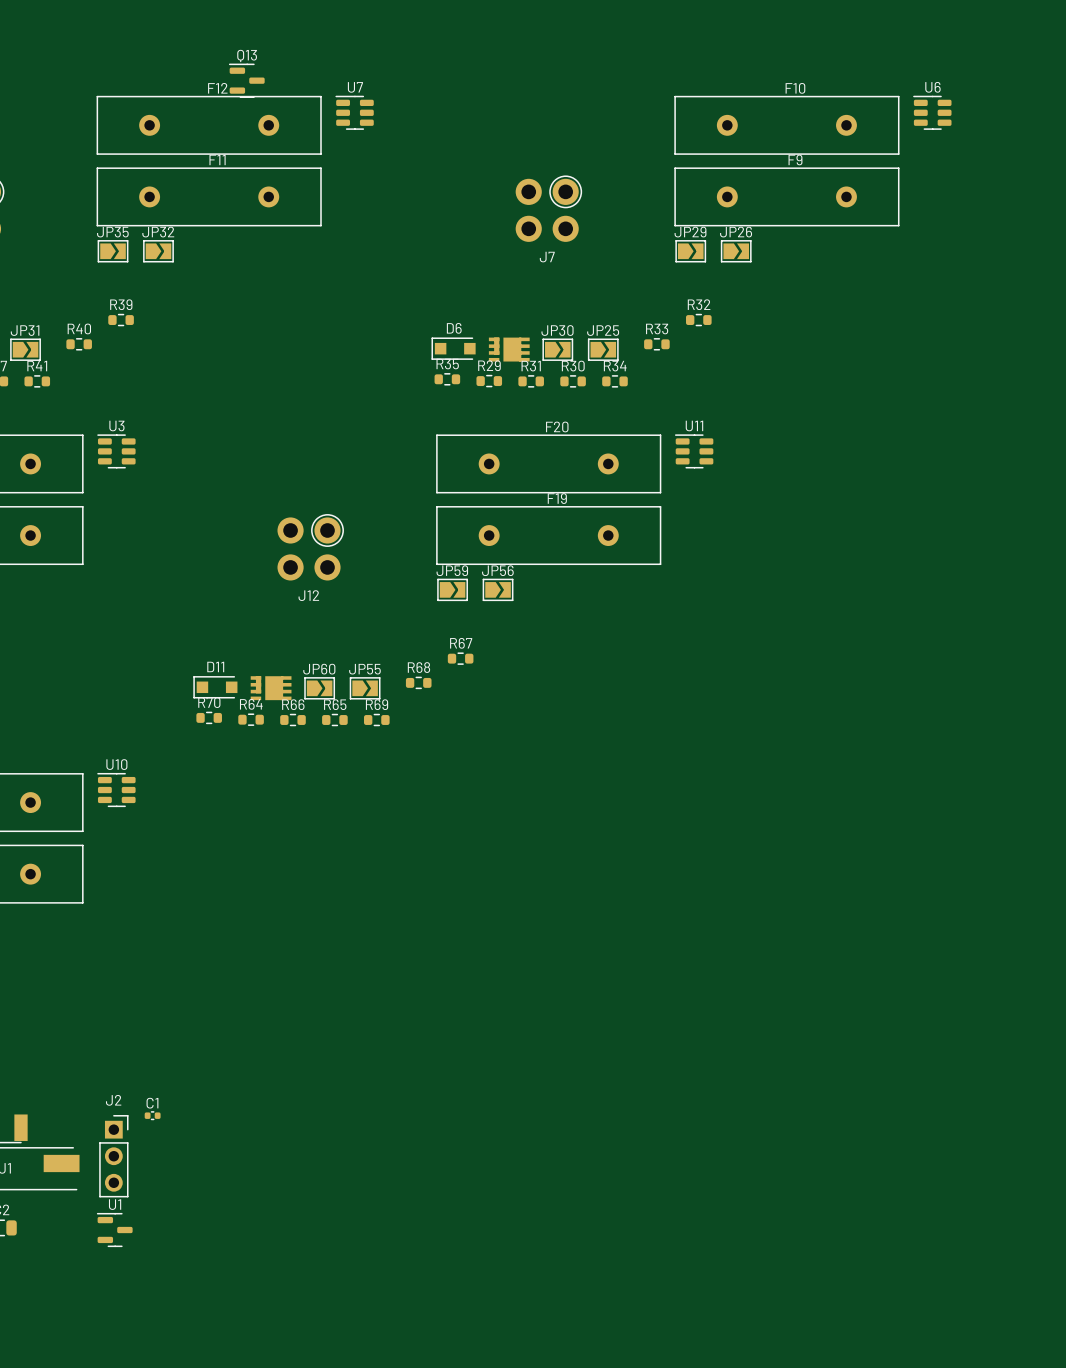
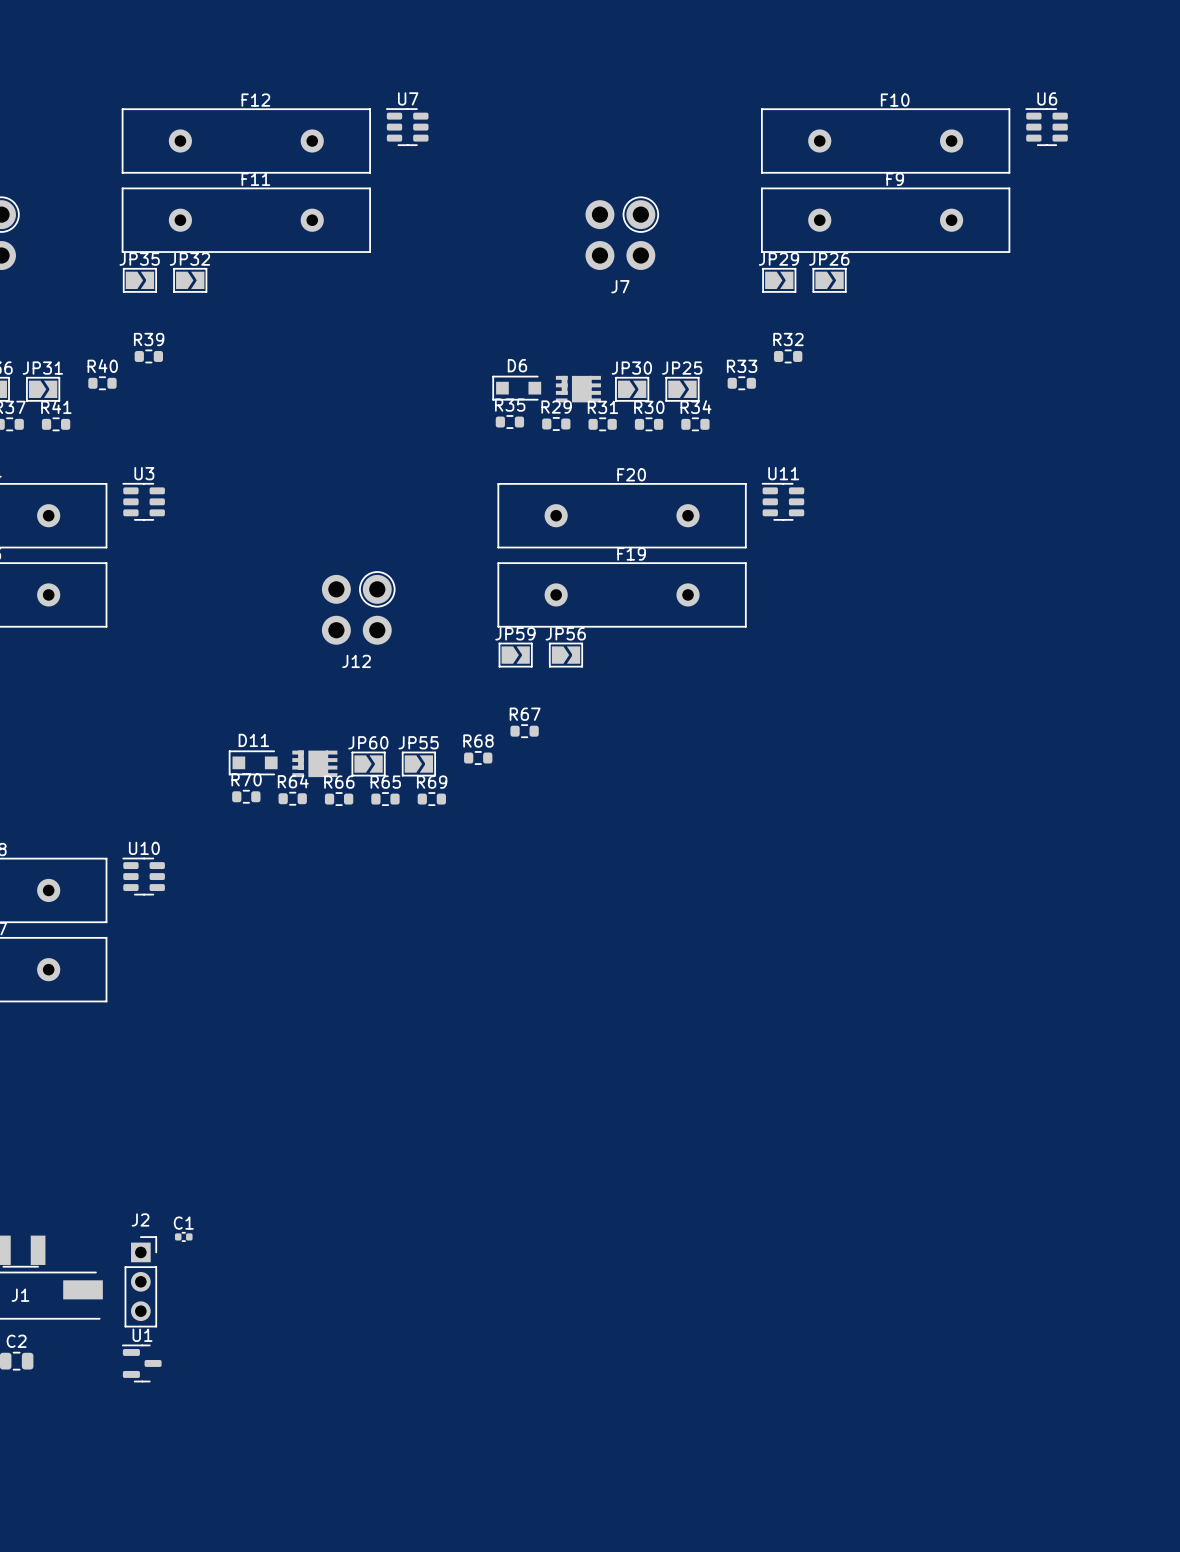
Q13: (246, 80) -> none

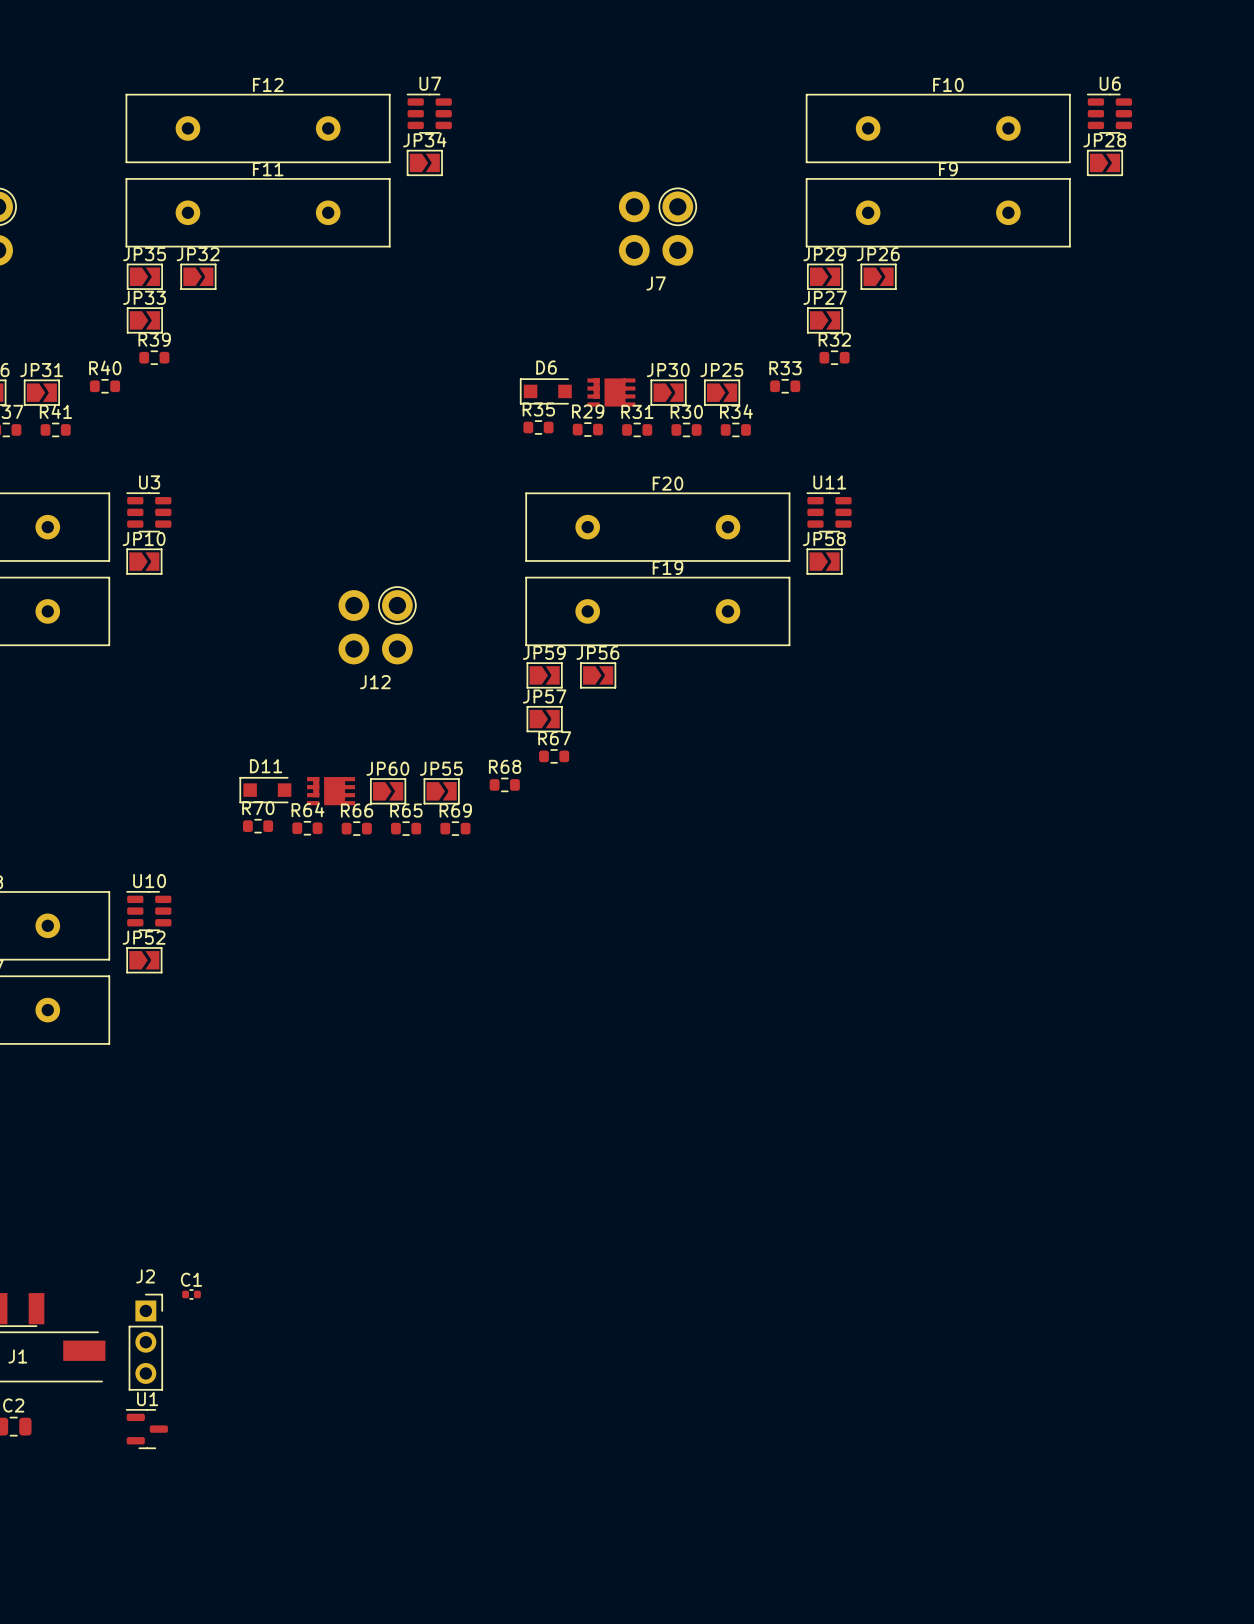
JP34: none -> (424, 162)
JP28: none -> (1104, 162)
JP33: none -> (144, 320)
JP27: none -> (825, 320)
JP10: none -> (144, 561)
JP58: none -> (824, 561)
JP57: none -> (544, 719)
JP52: none -> (144, 960)

